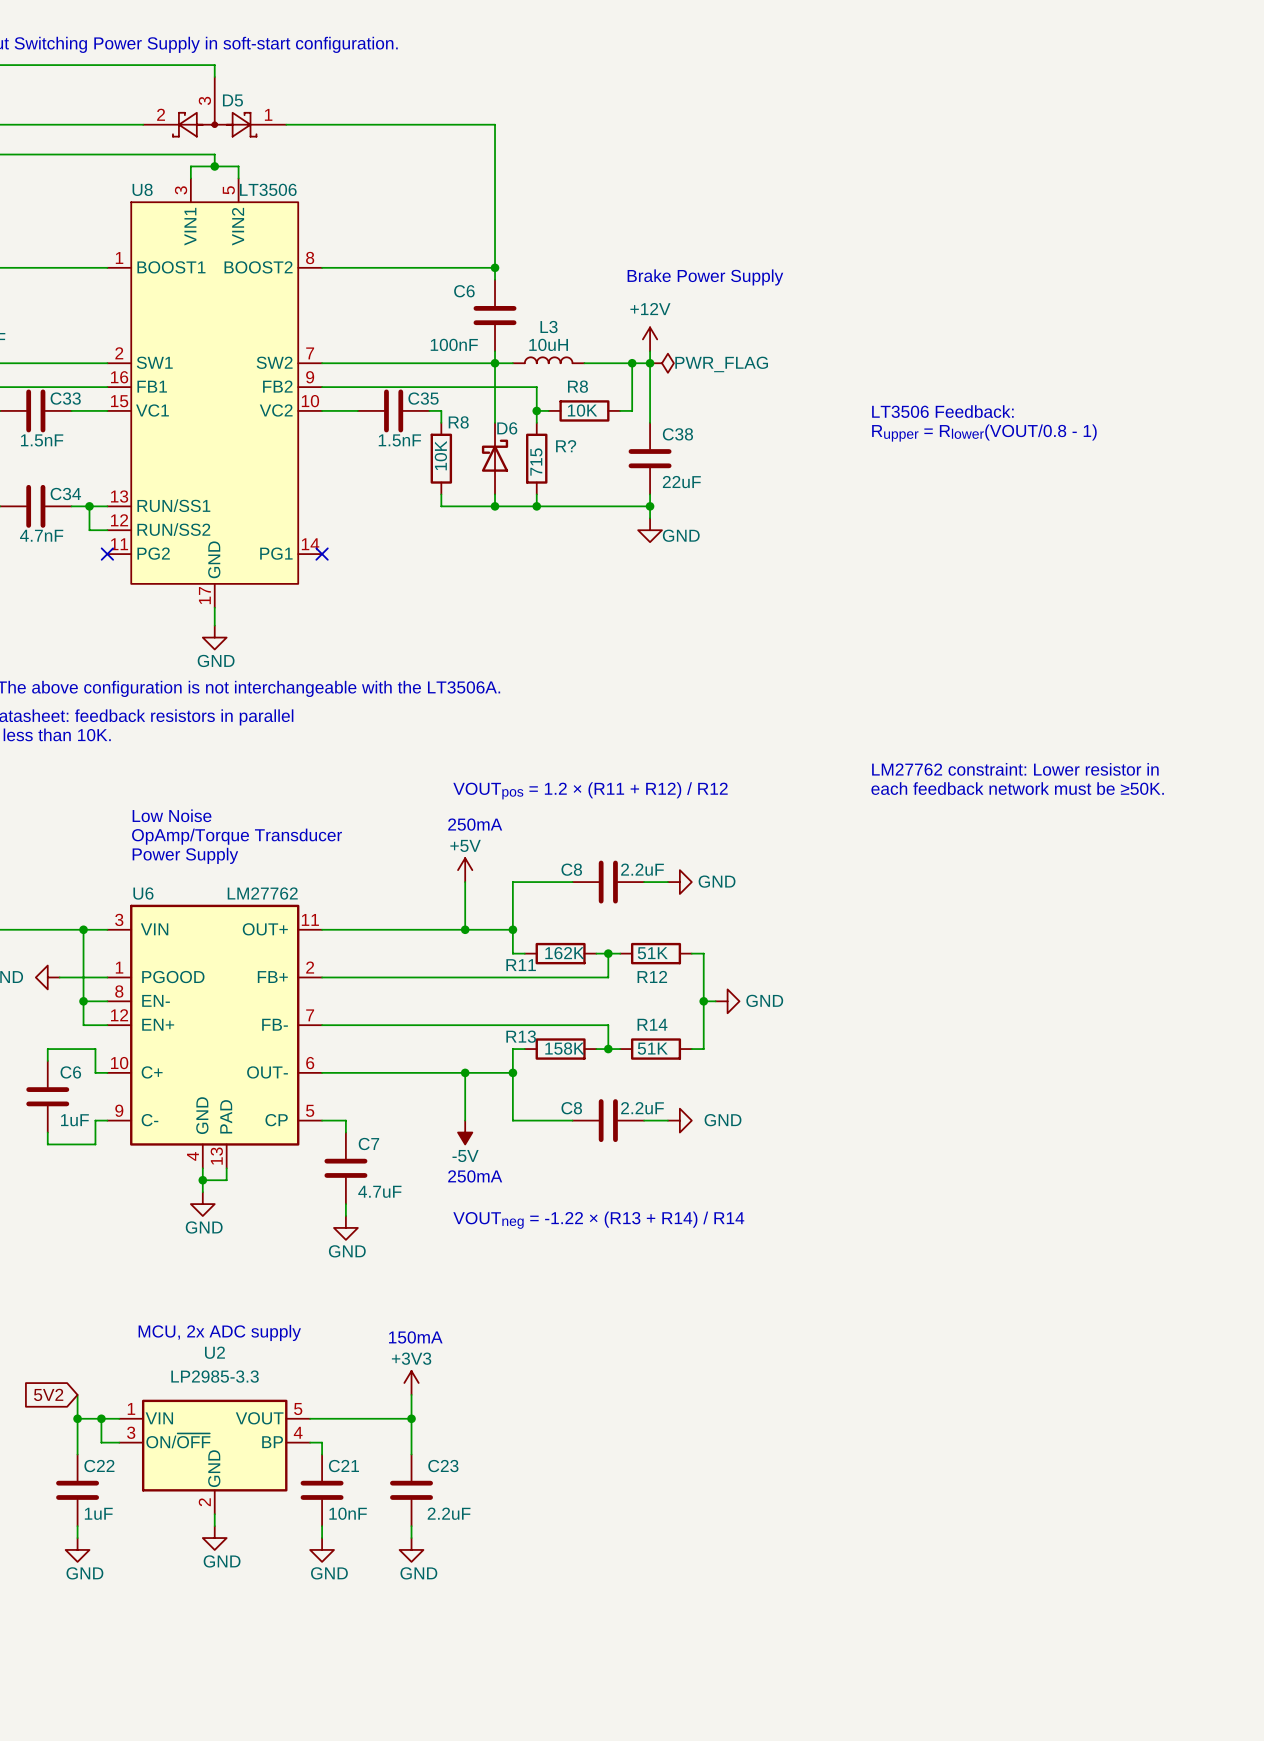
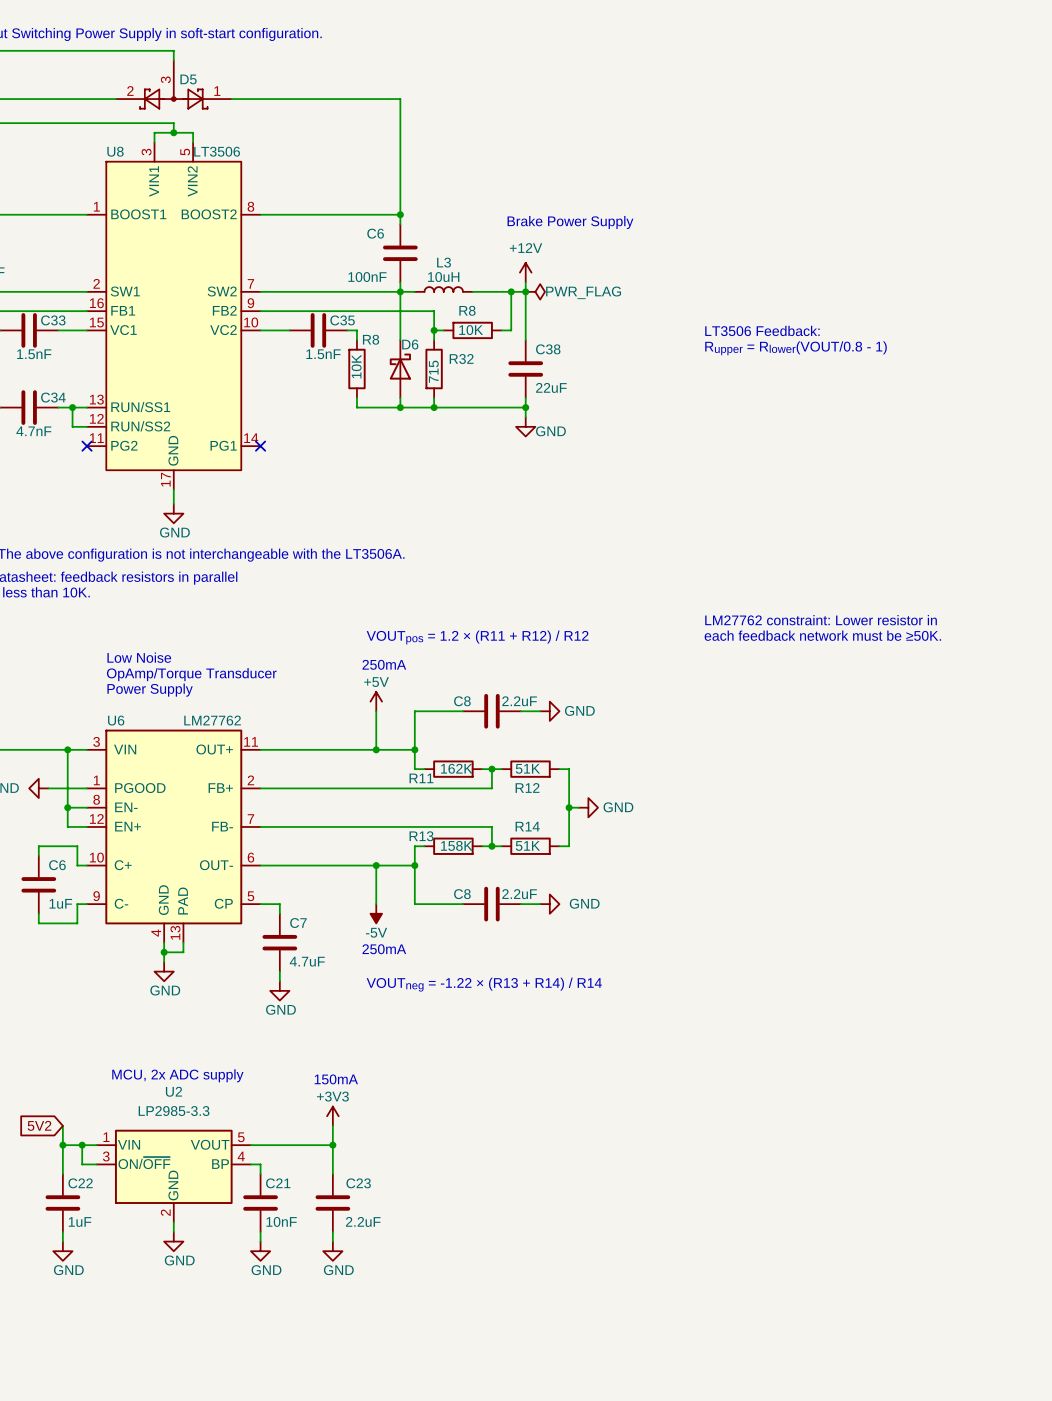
R? name: R? (566, 446) -> R32 (461, 359)

